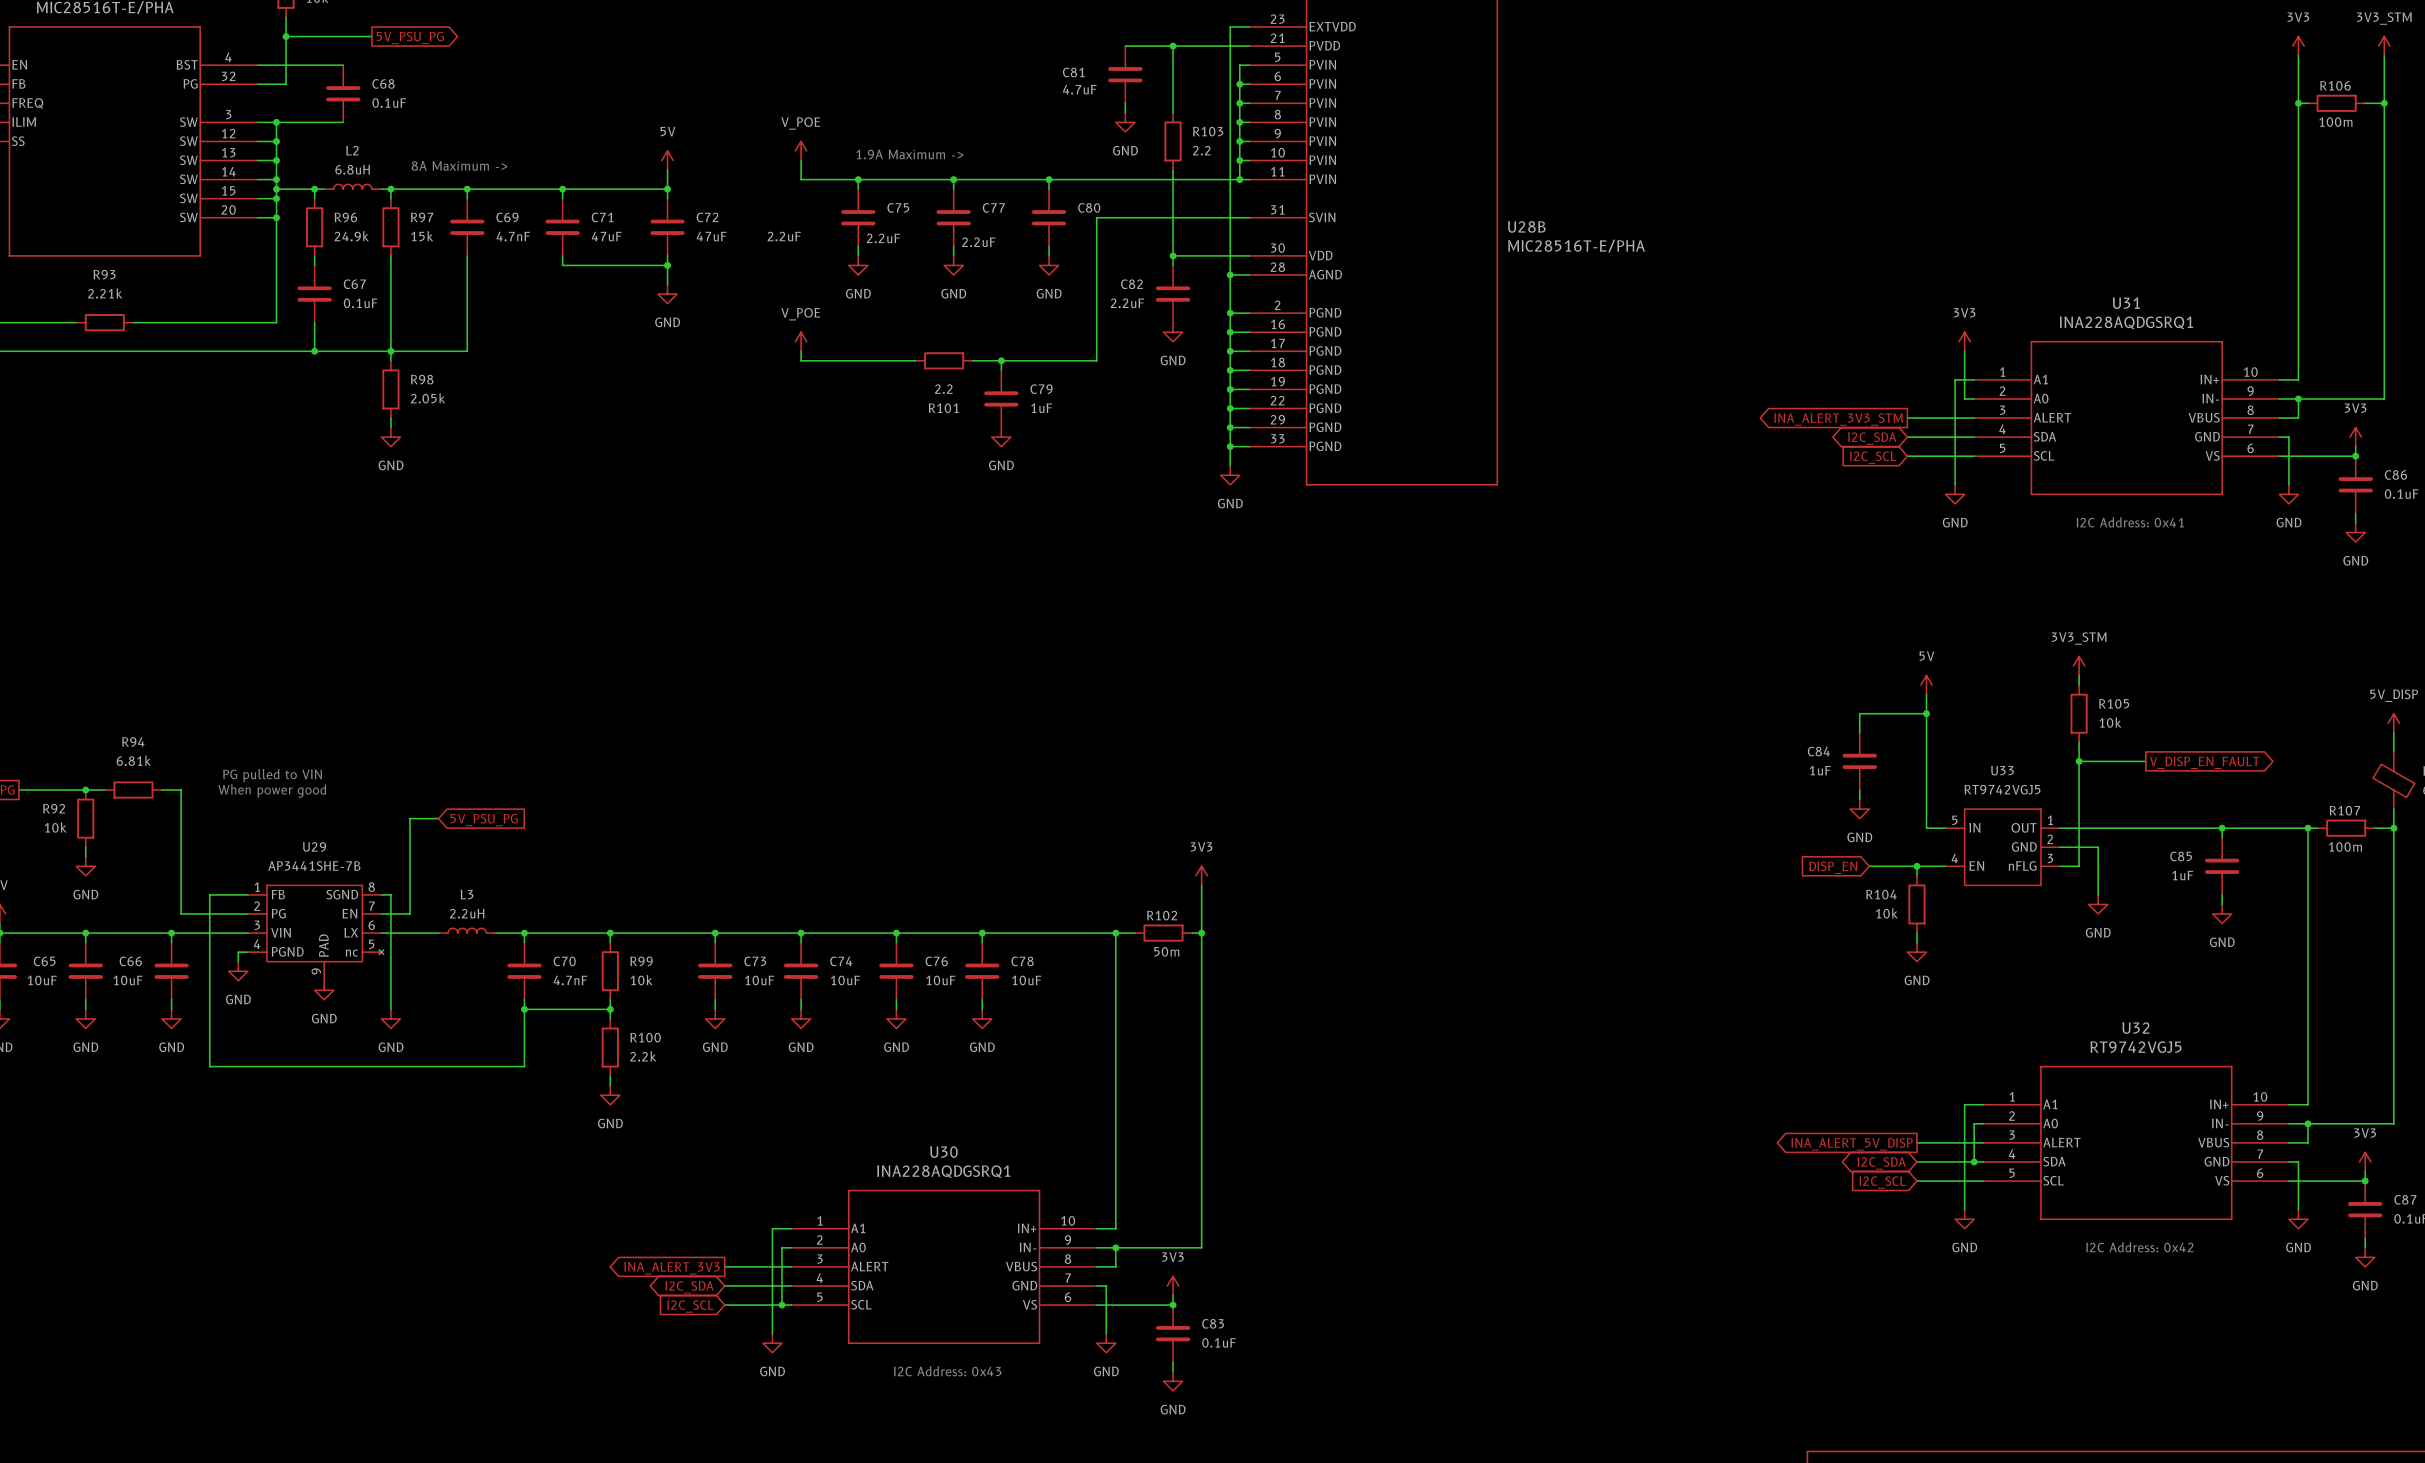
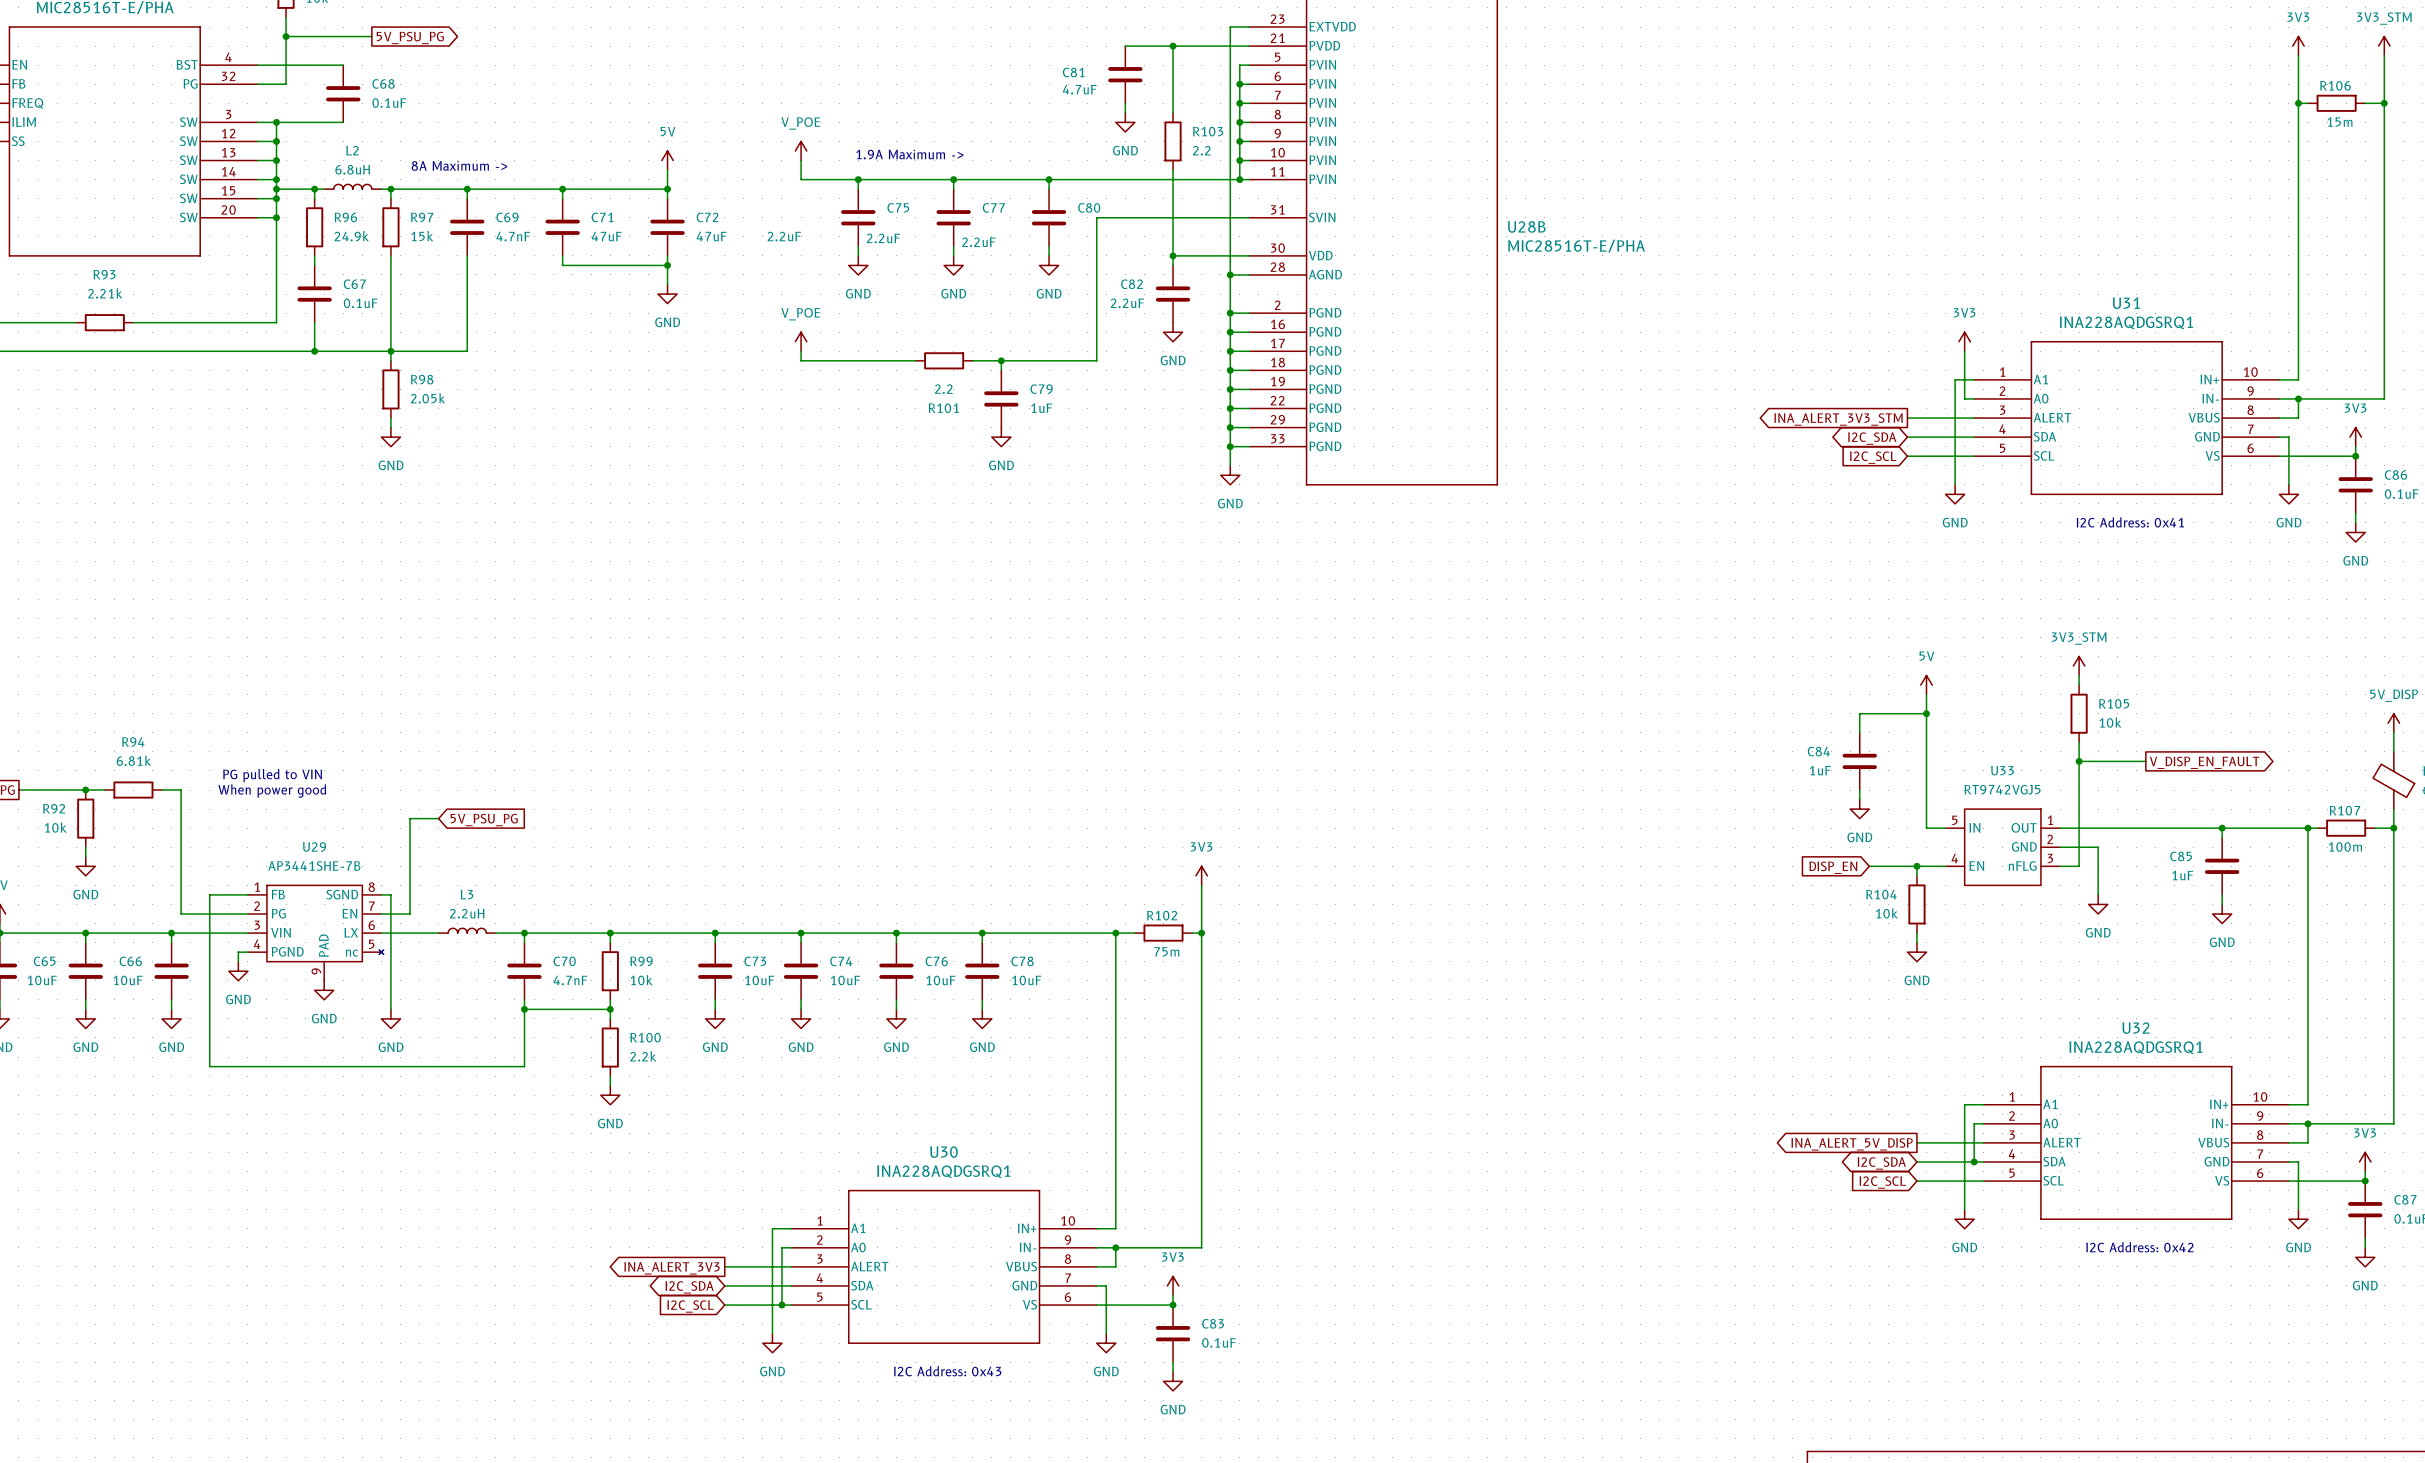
R106 value: 100m (2335, 122) -> 15m (2339, 122)
R102 value: 50m (1166, 951) -> 75m (1166, 951)
U32 value: RT9742VGJ5 (2135, 1047) -> INA228AQDGSRQ1 (2135, 1047)

